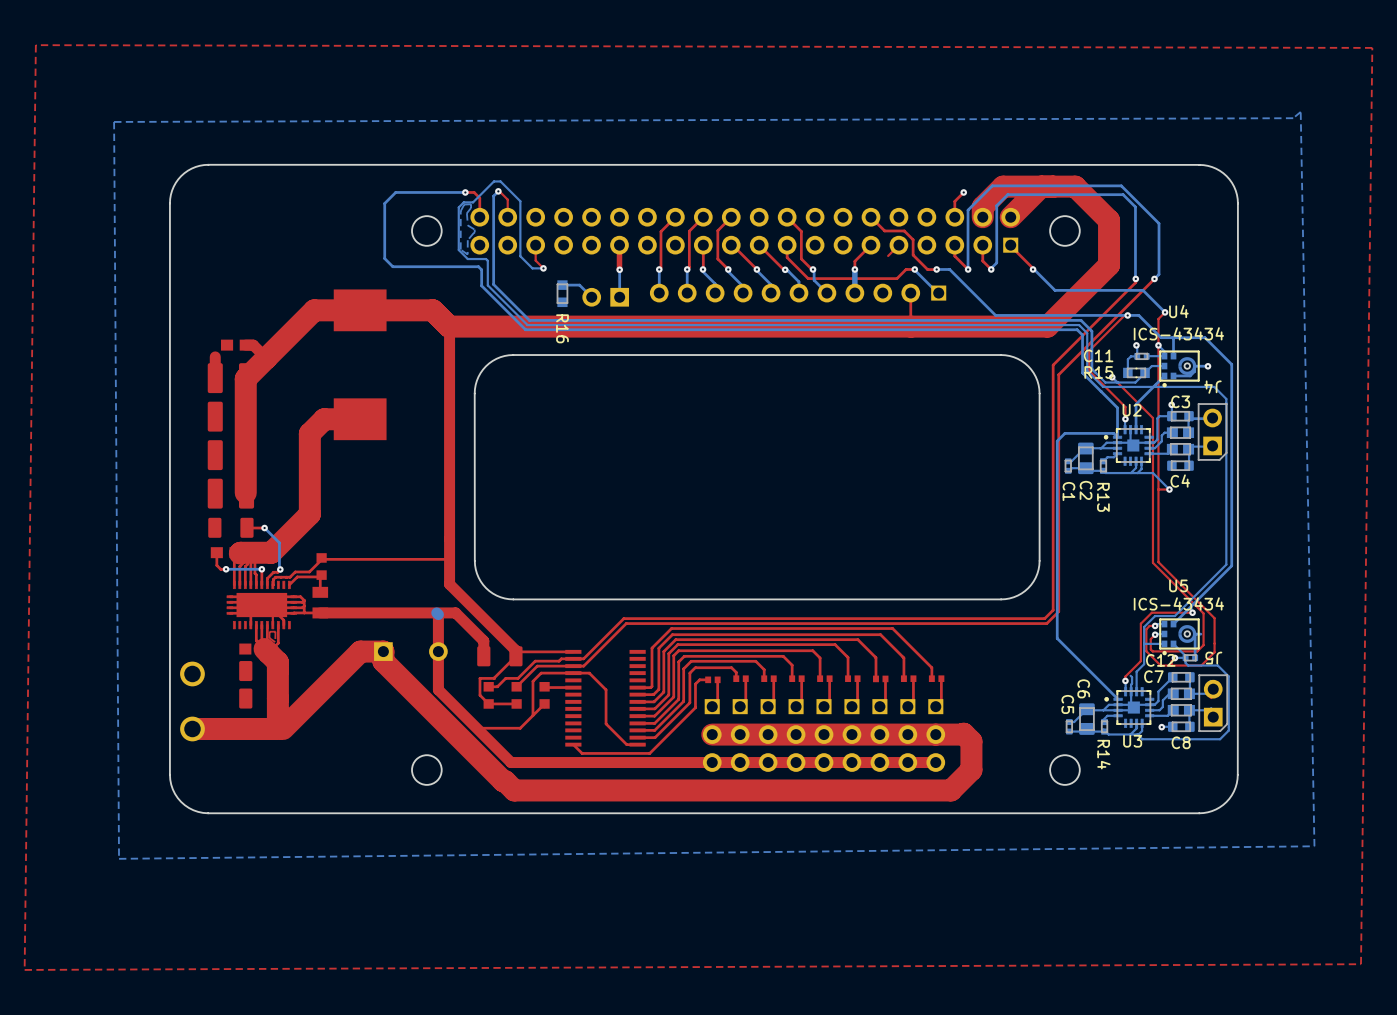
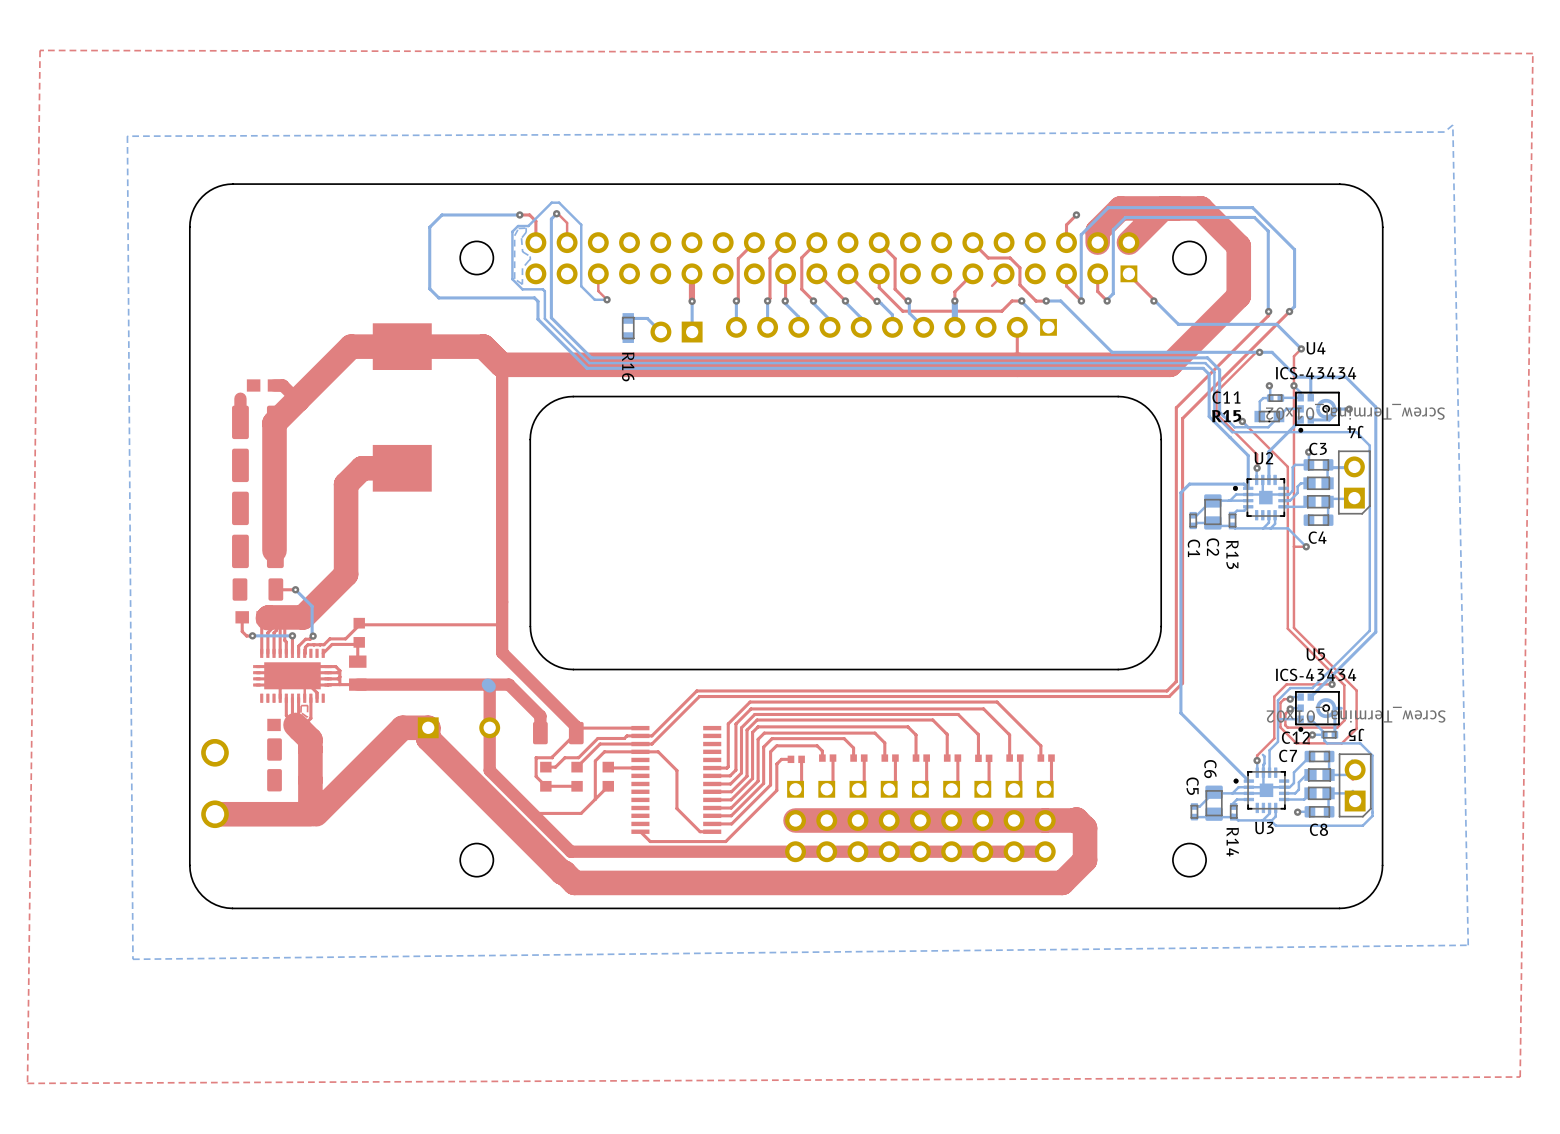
J4 value: none -> Screw_Terminal_01x02 (1355, 412)
J5 value: none -> Screw_Terminal_01x02 (1356, 715)

